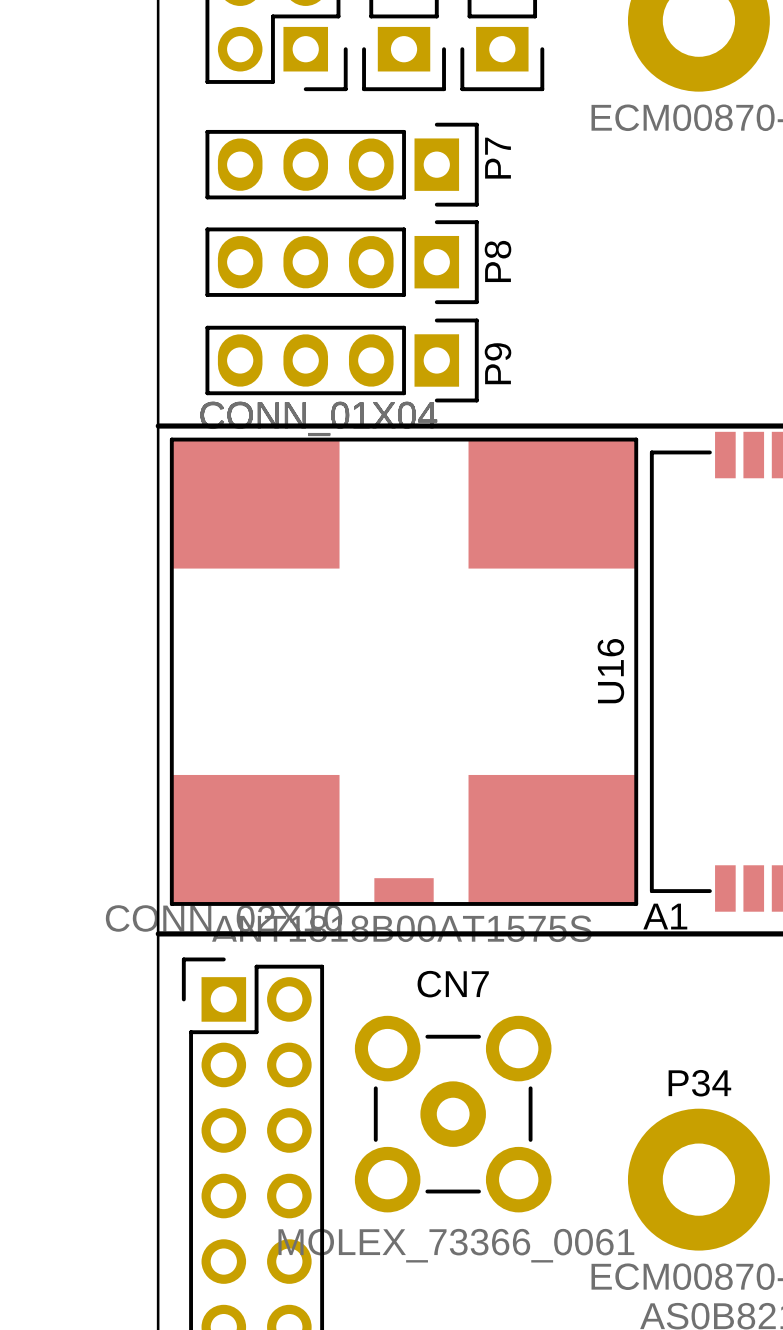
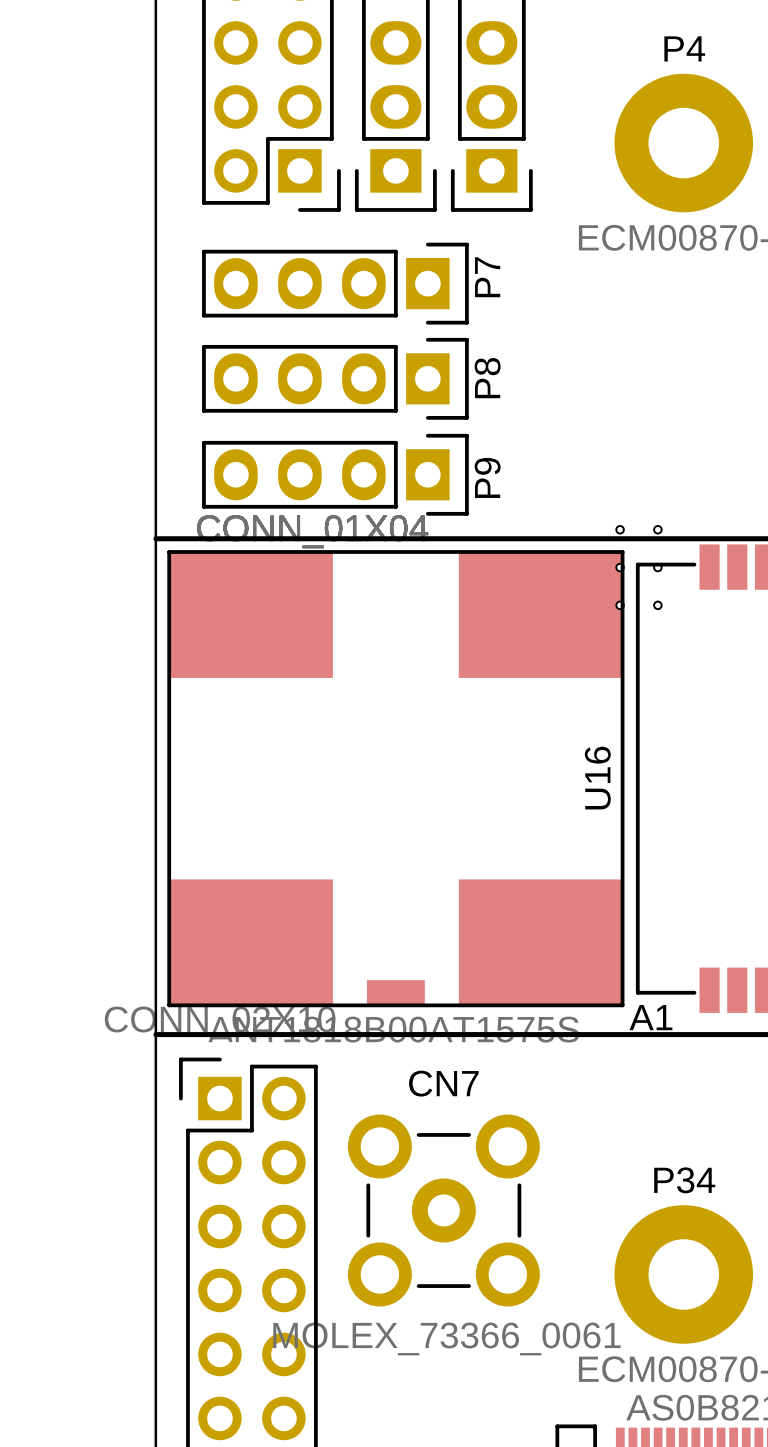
part: none -> (638, 567)

